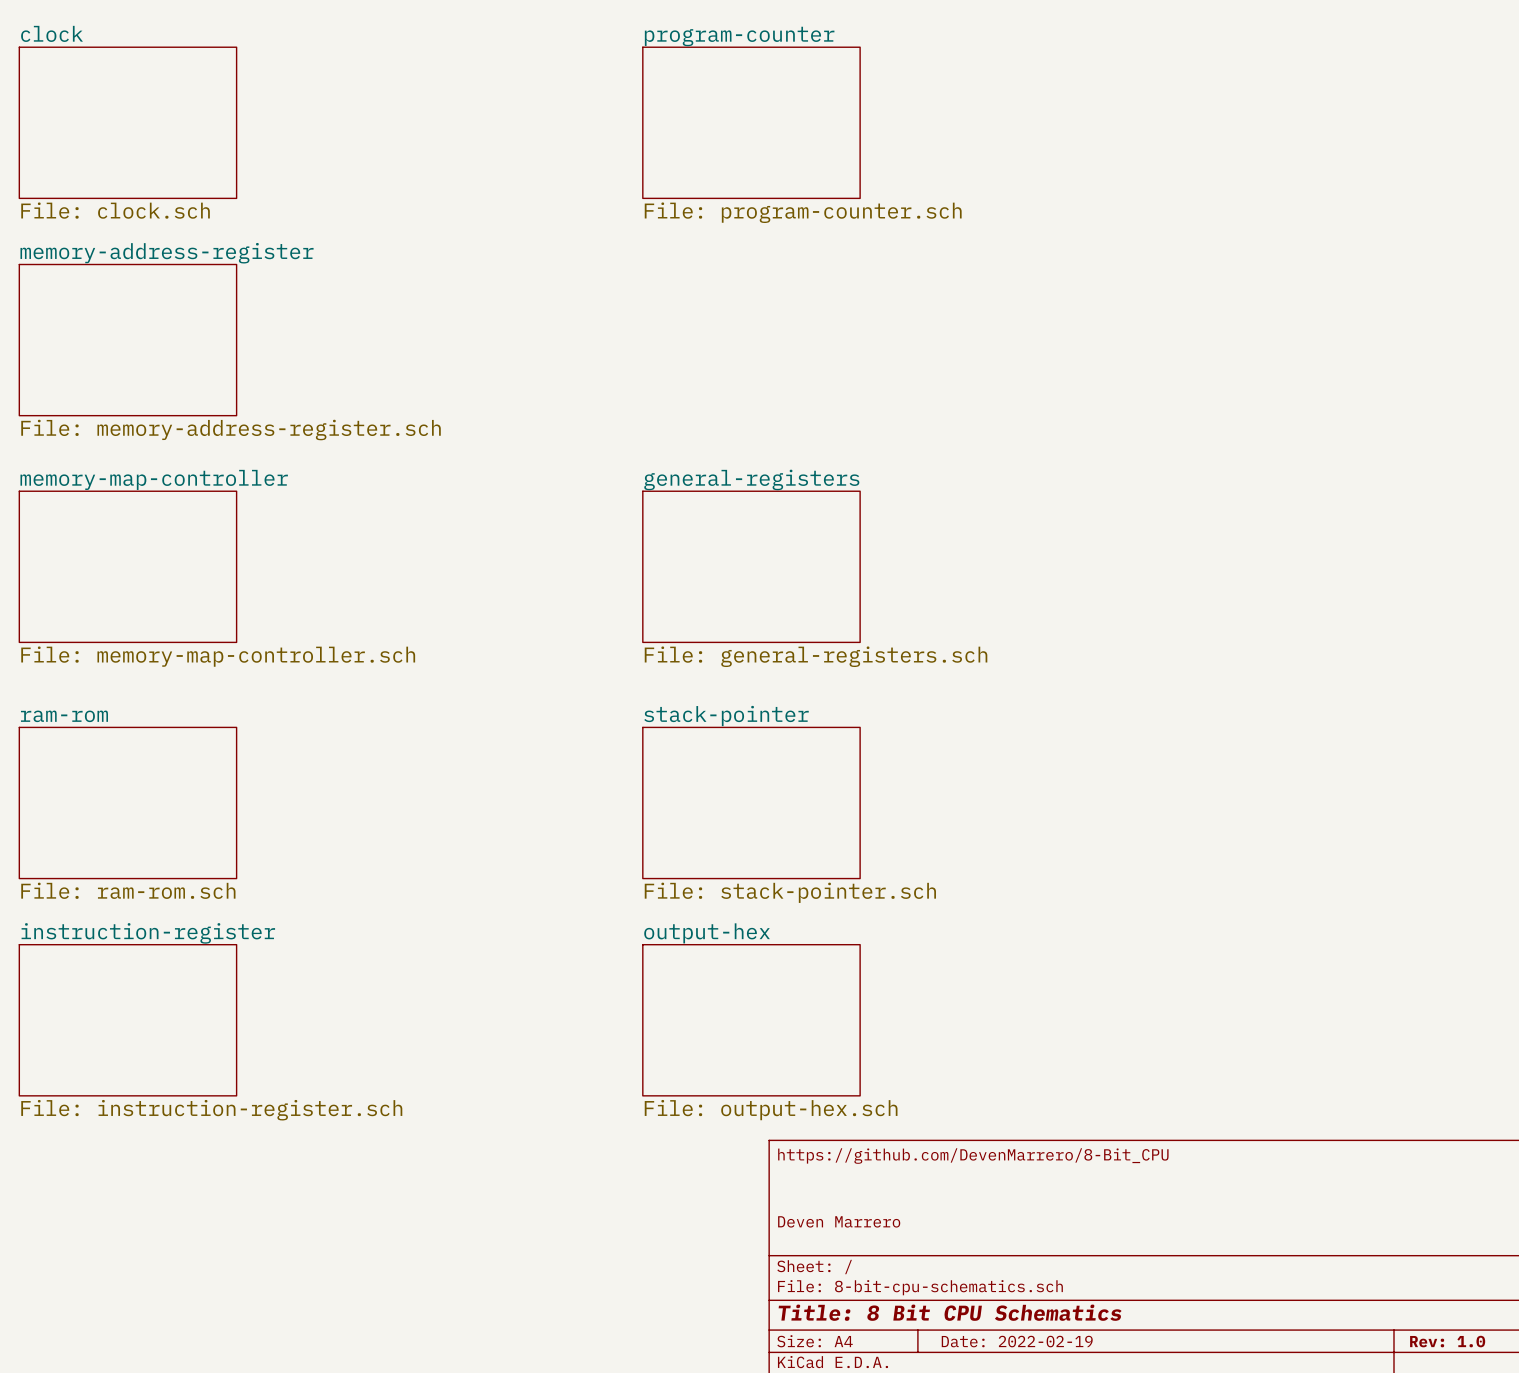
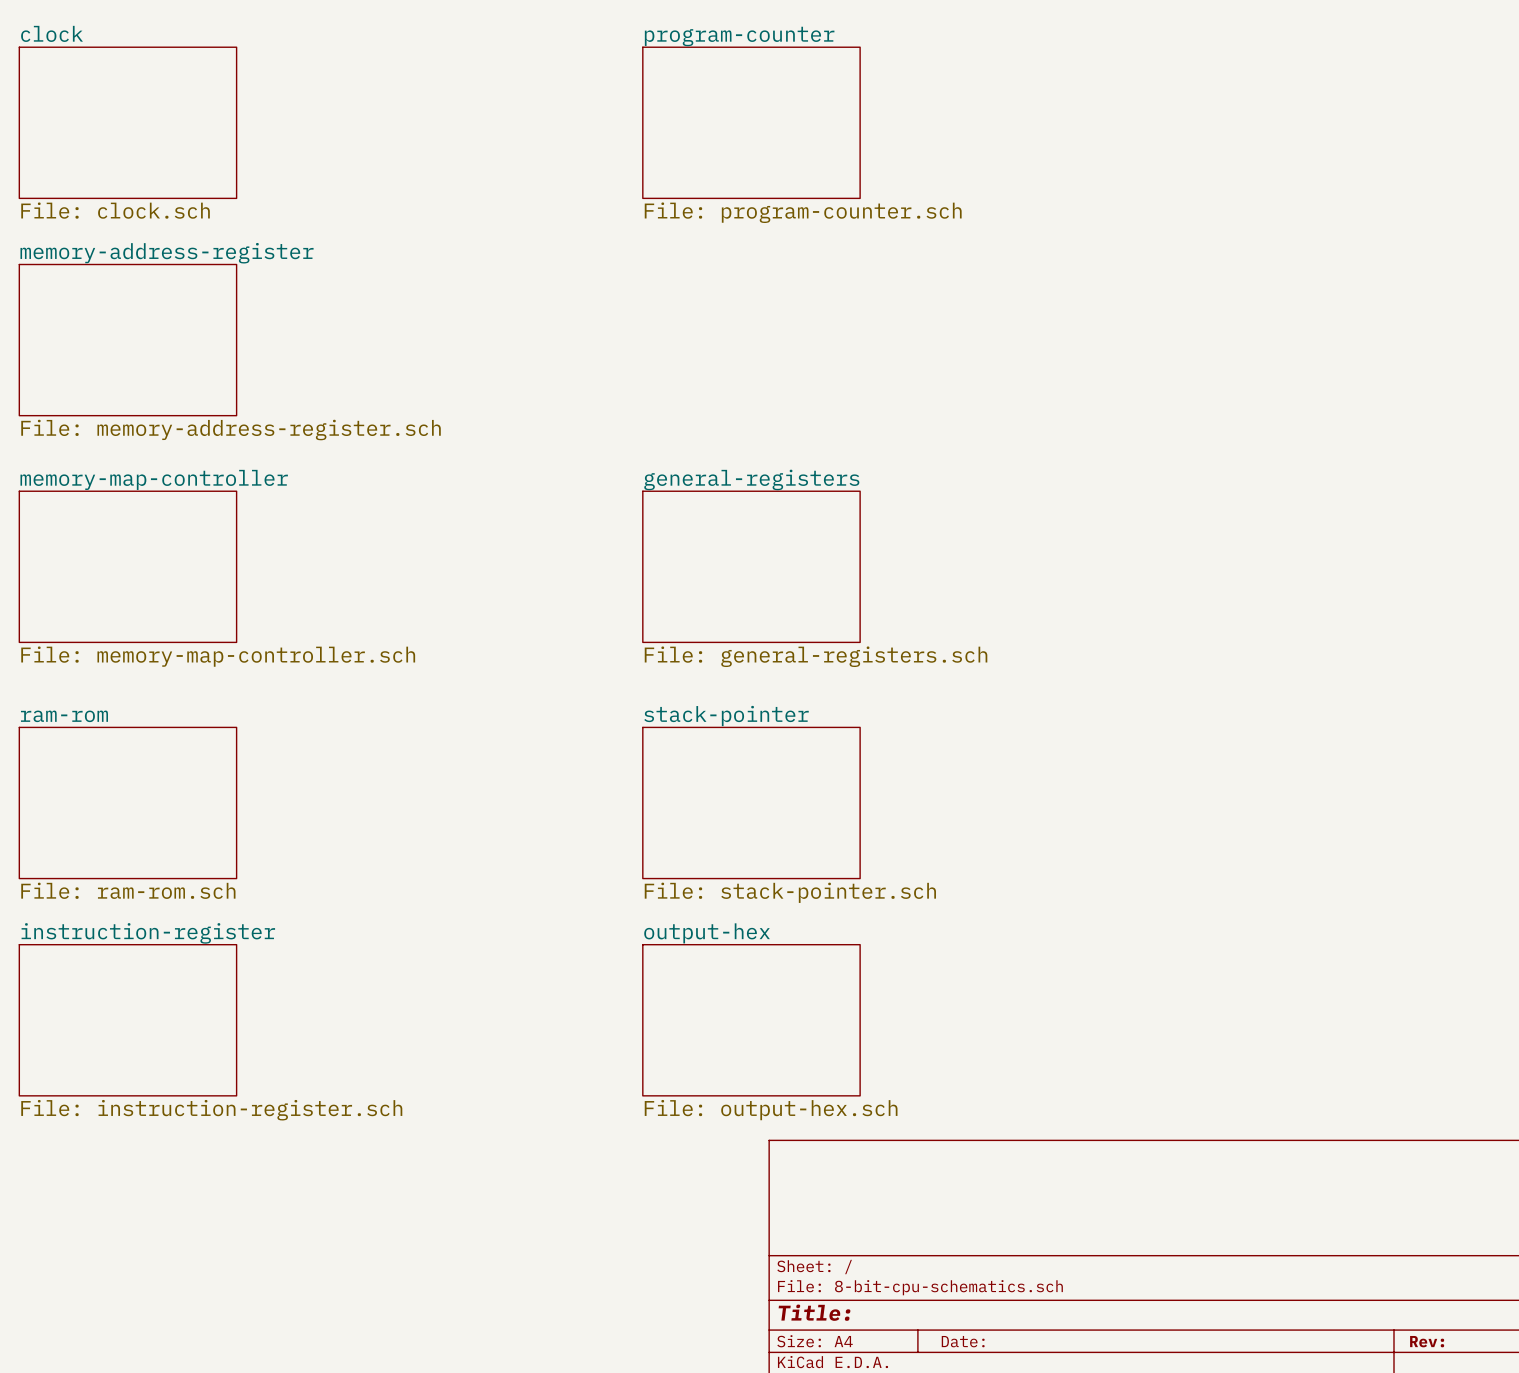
title block: https://github.com/DevenMarrero/8-Bit_CPU (973, 1156) -> none
title block: Deven Marrero (839, 1221) -> none
title block: Title: 8 Bit CPU Schematics (950, 1312) -> Title: (814, 1312)
title block: Date: 2022-02-19 (1017, 1341) -> Date: (963, 1341)
title block: Rev: 1.0 (1447, 1341) -> Rev: (1427, 1341)

